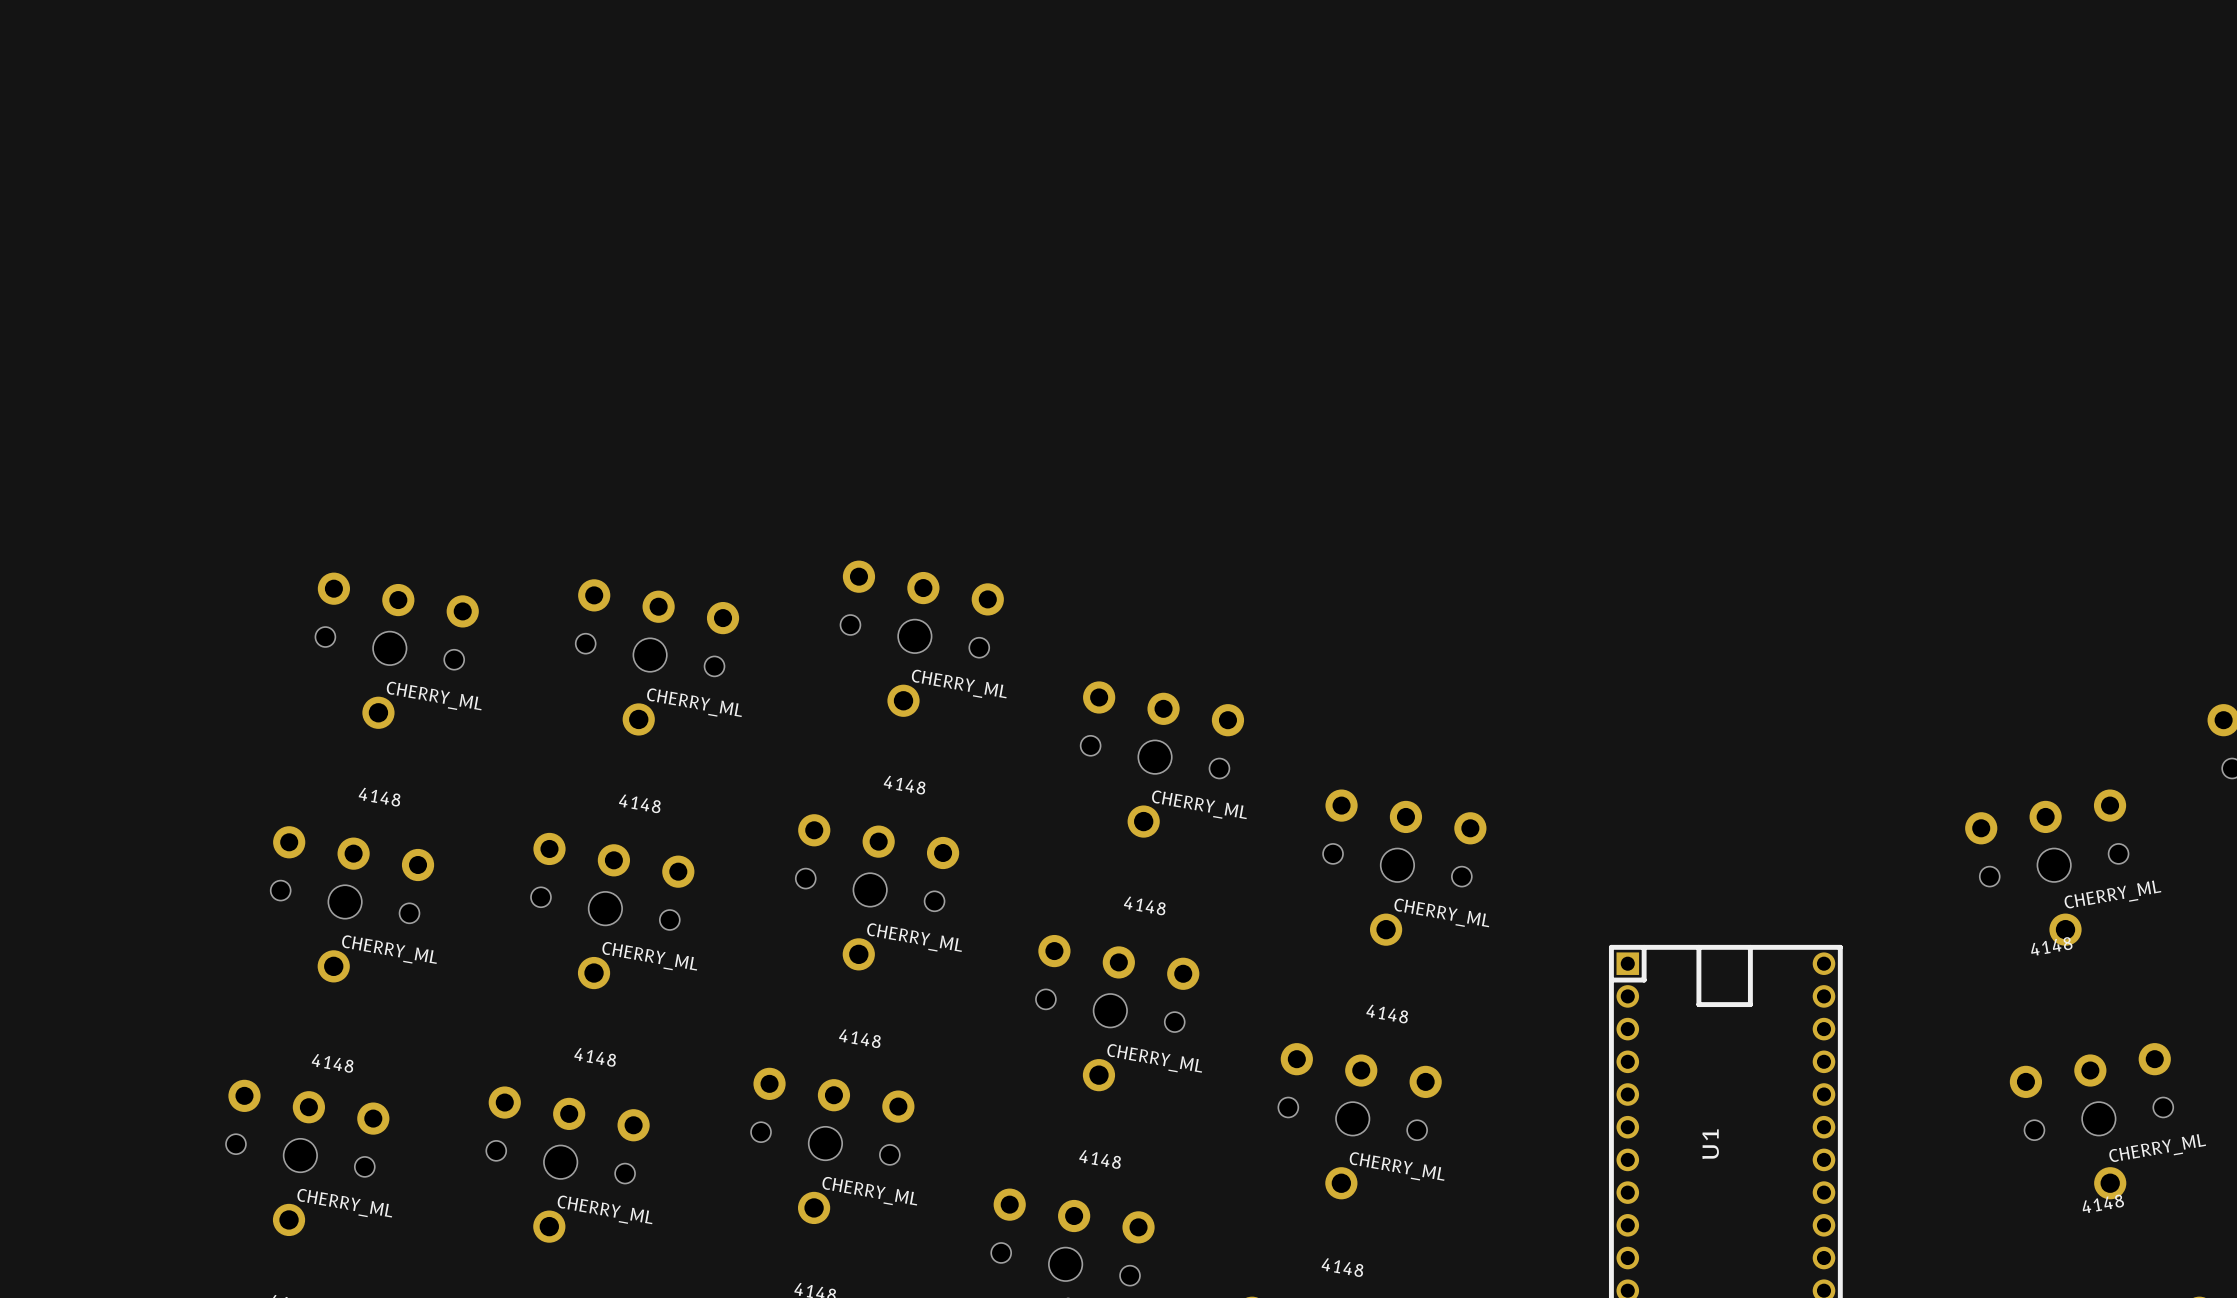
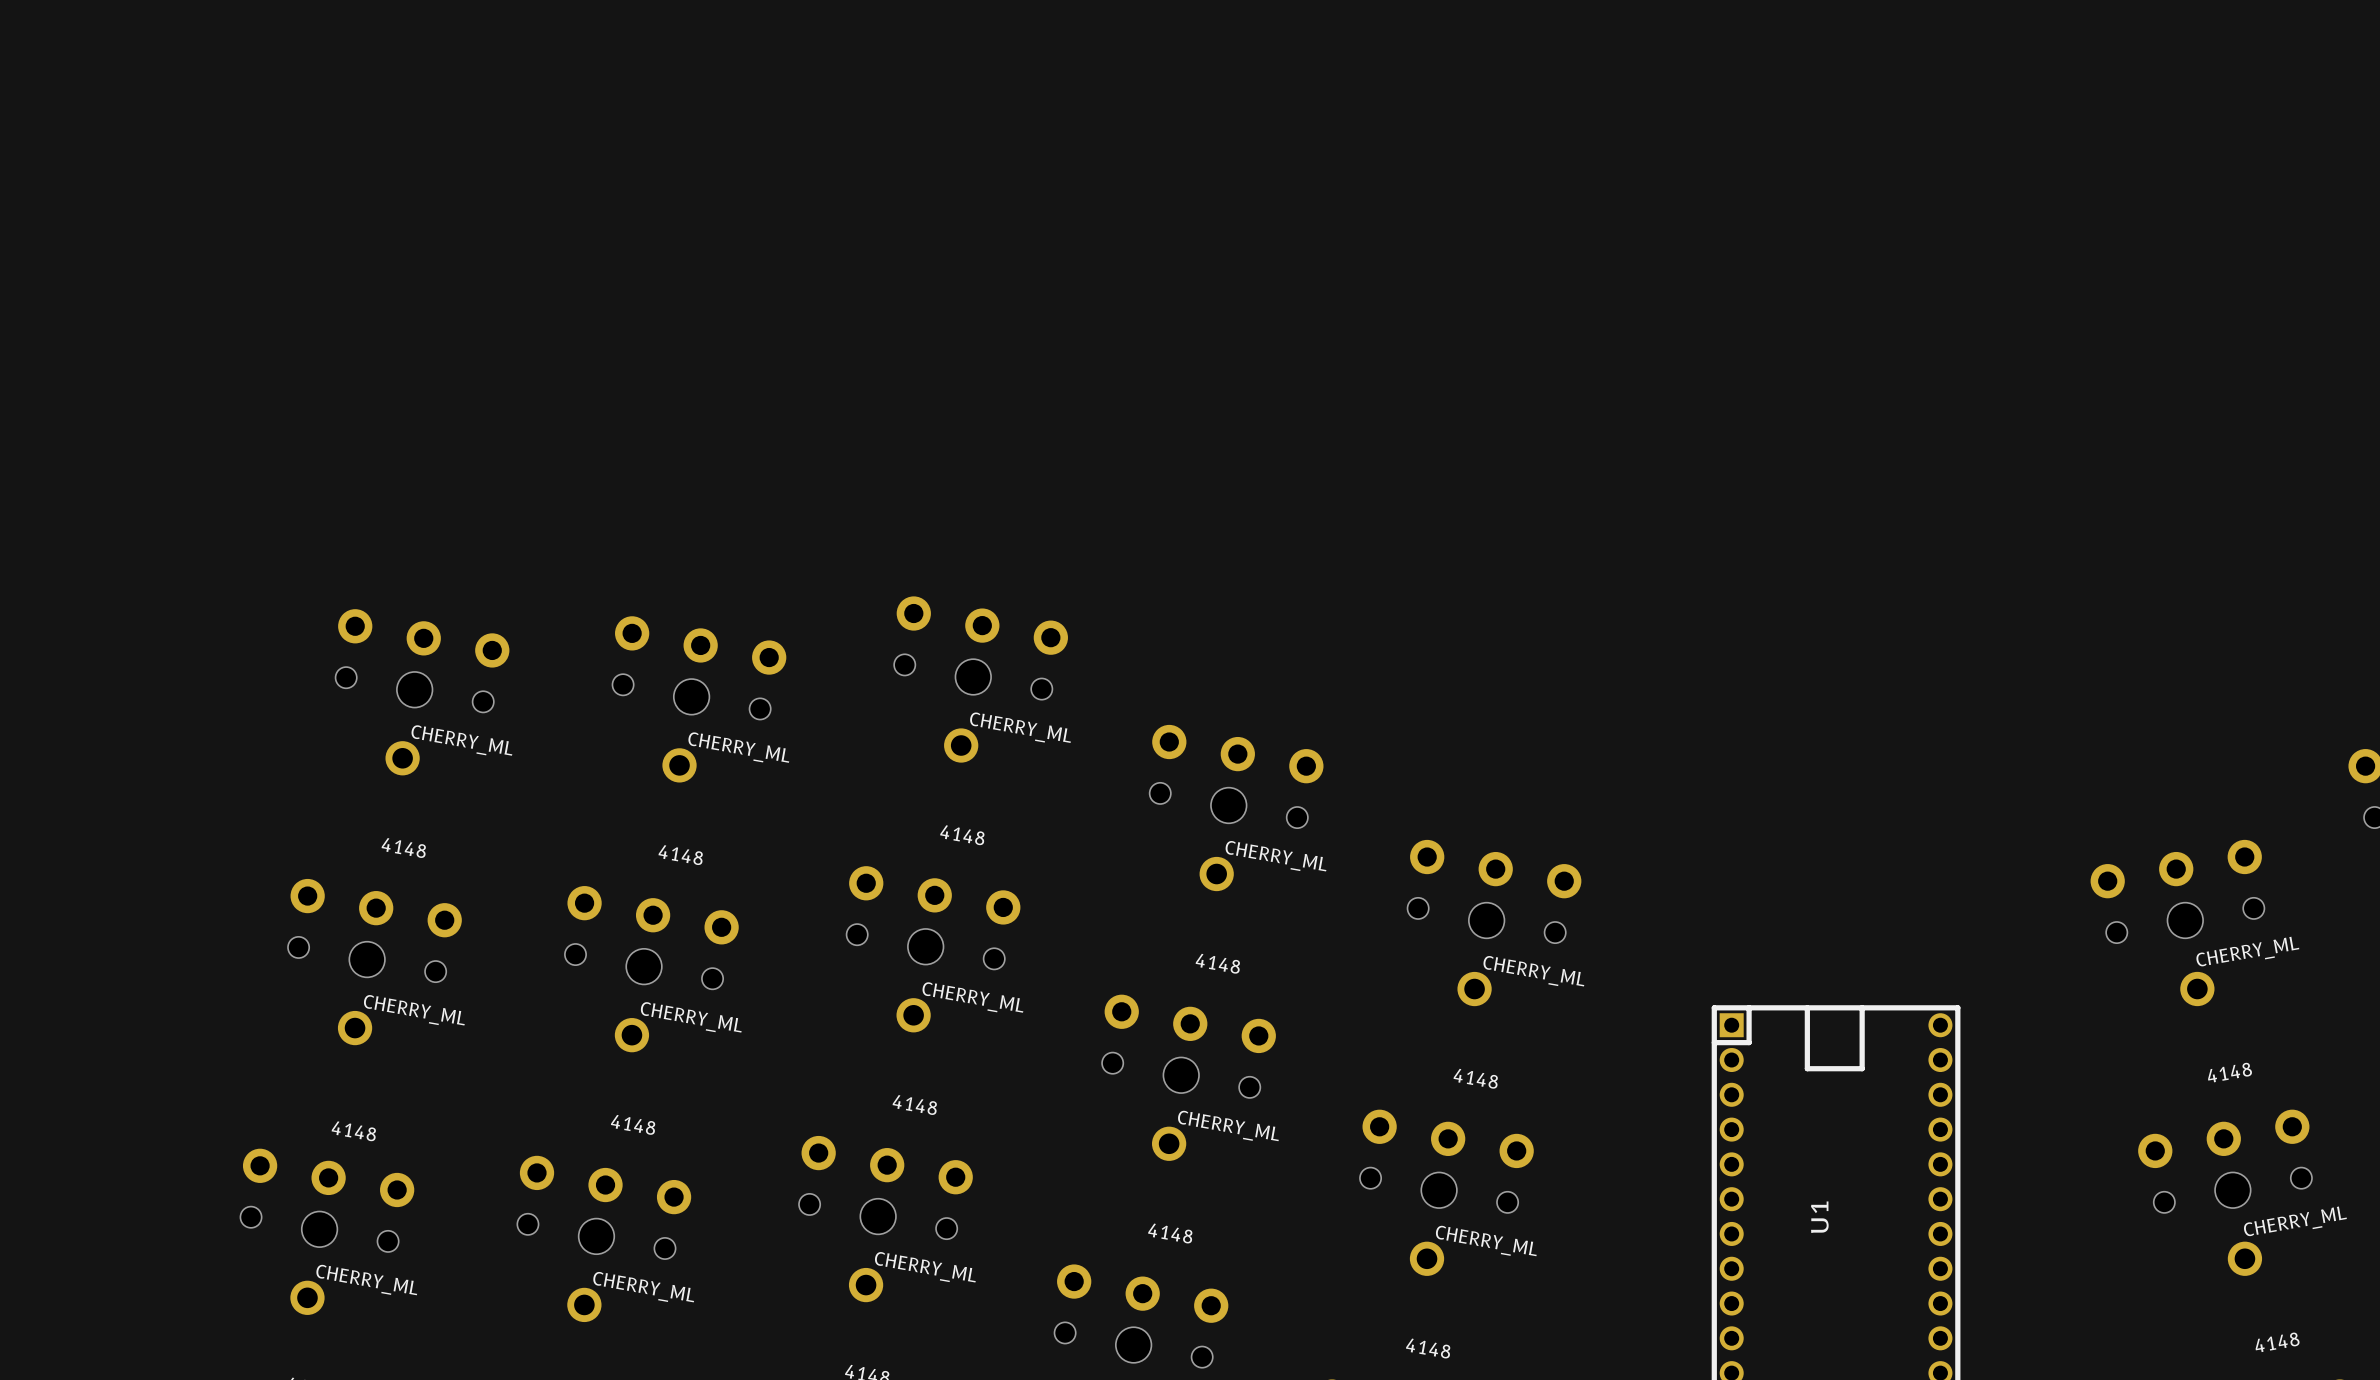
part position: (2051, 946) -> (2230, 1072)
part position: (2103, 1203) -> (2277, 1342)

